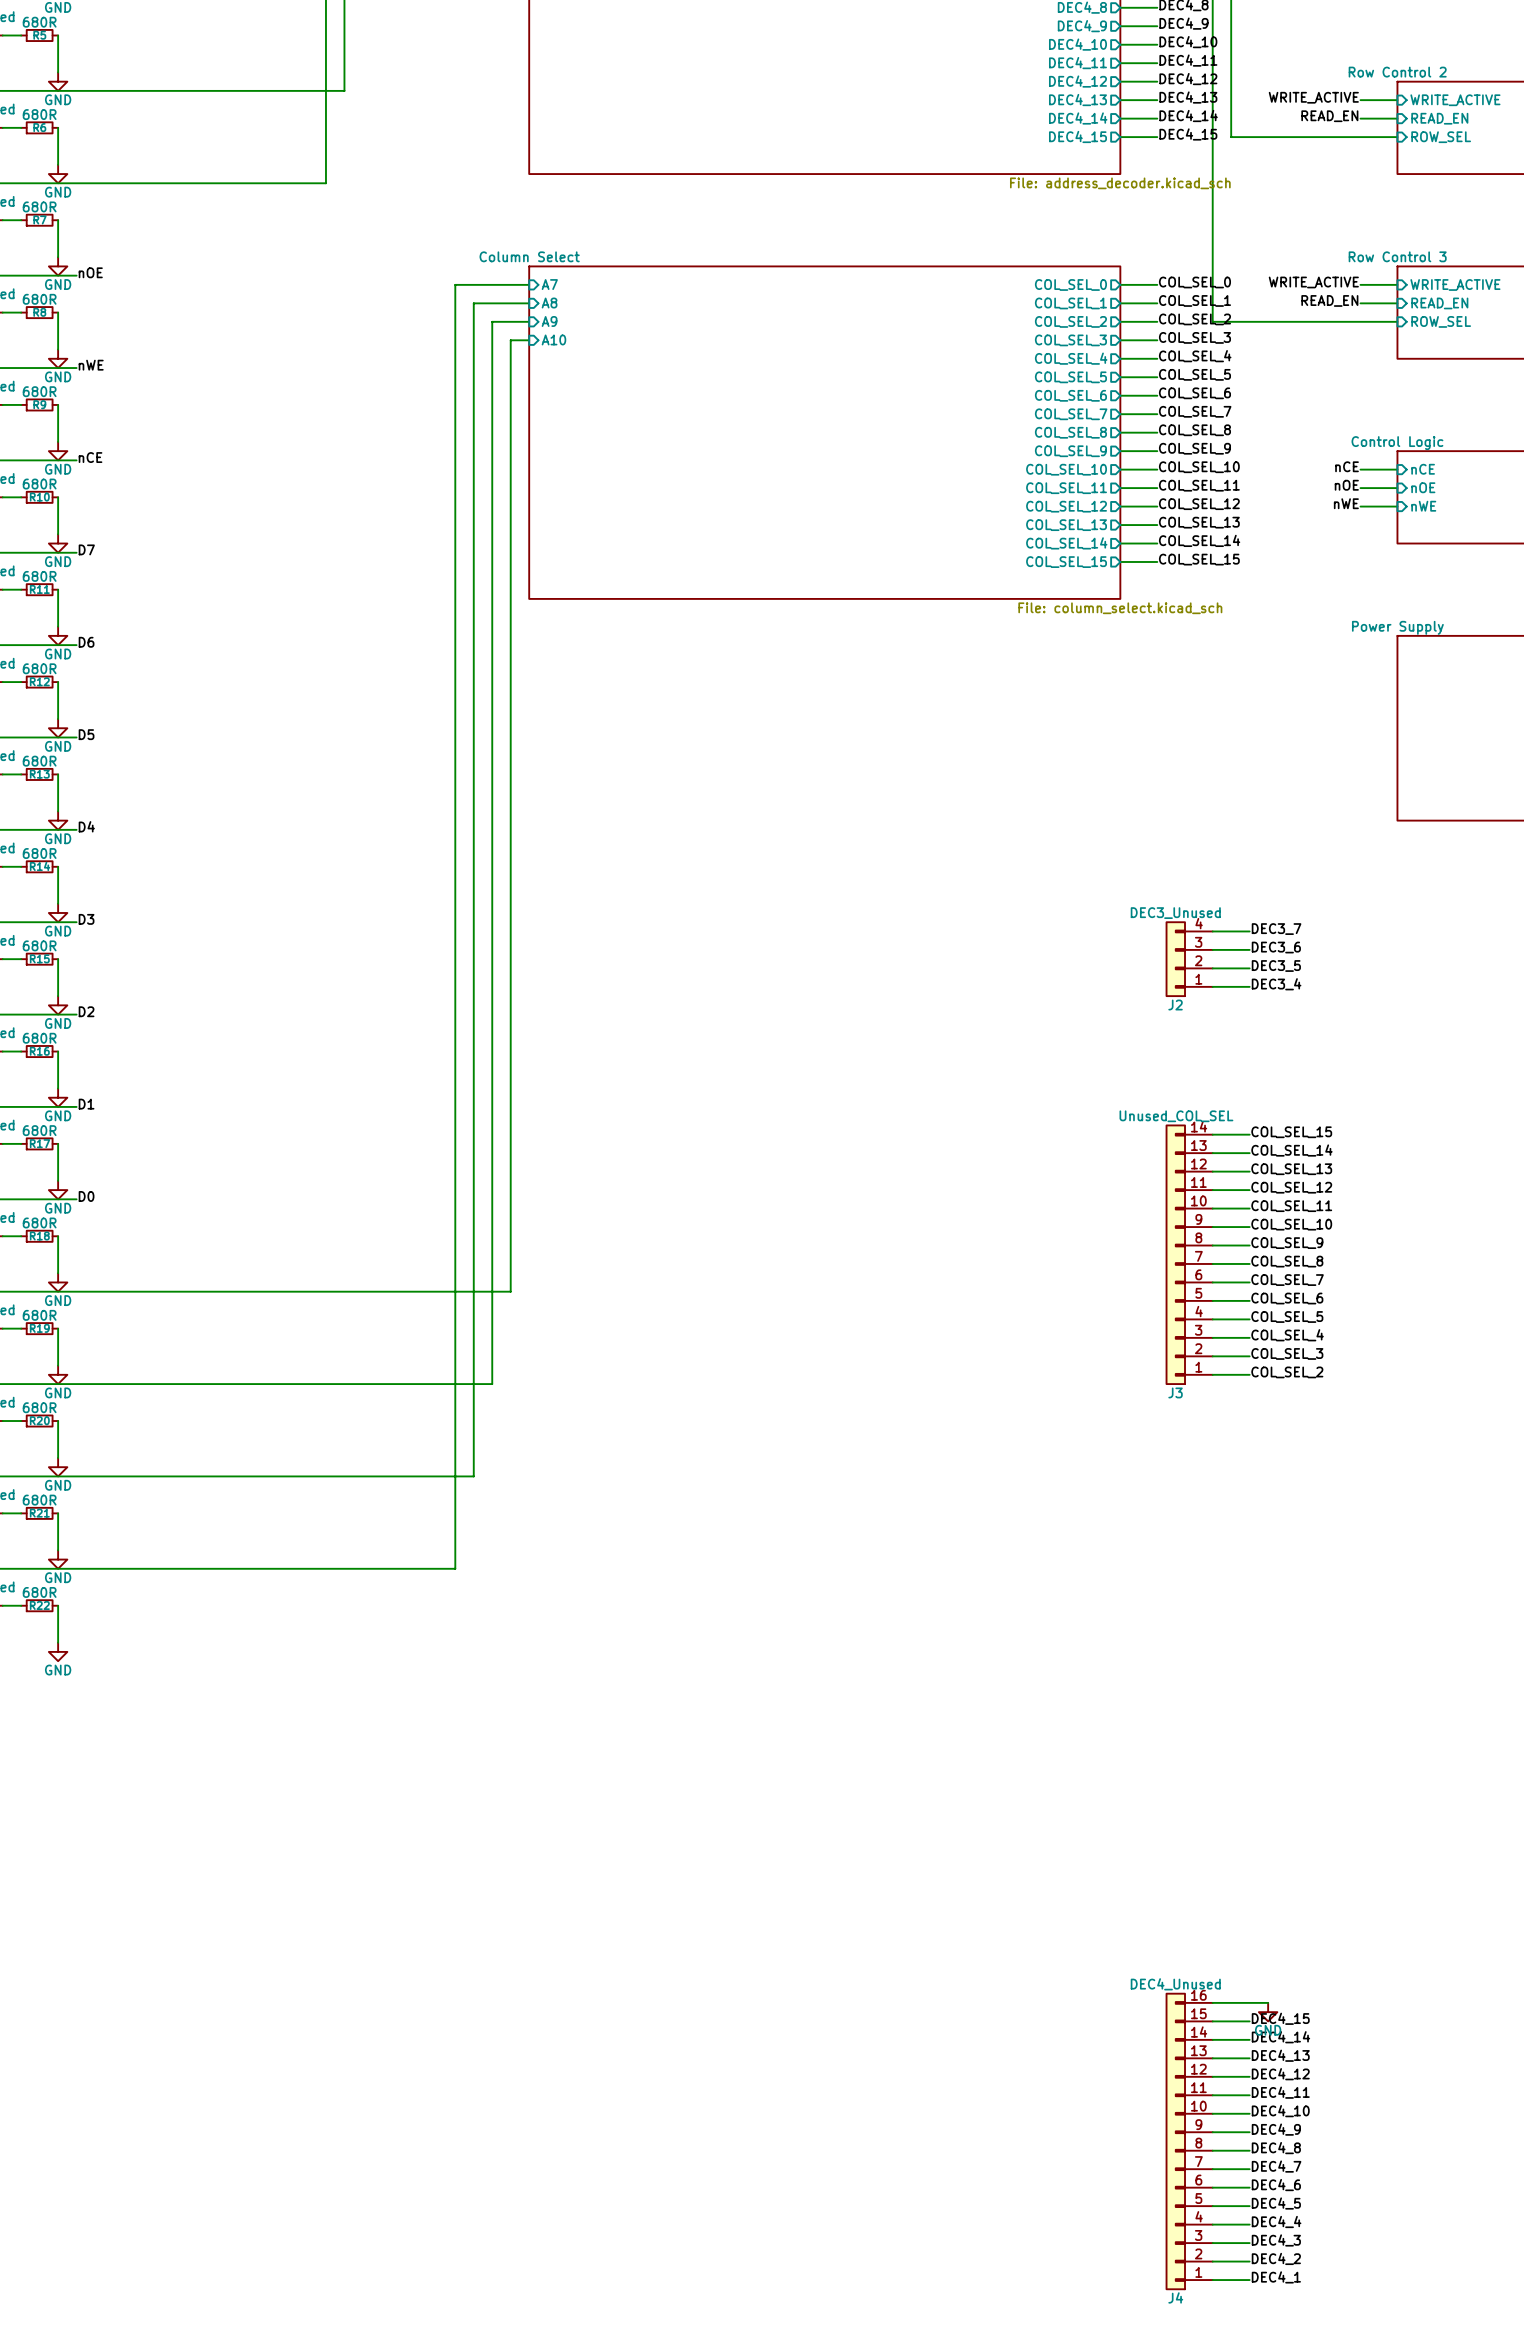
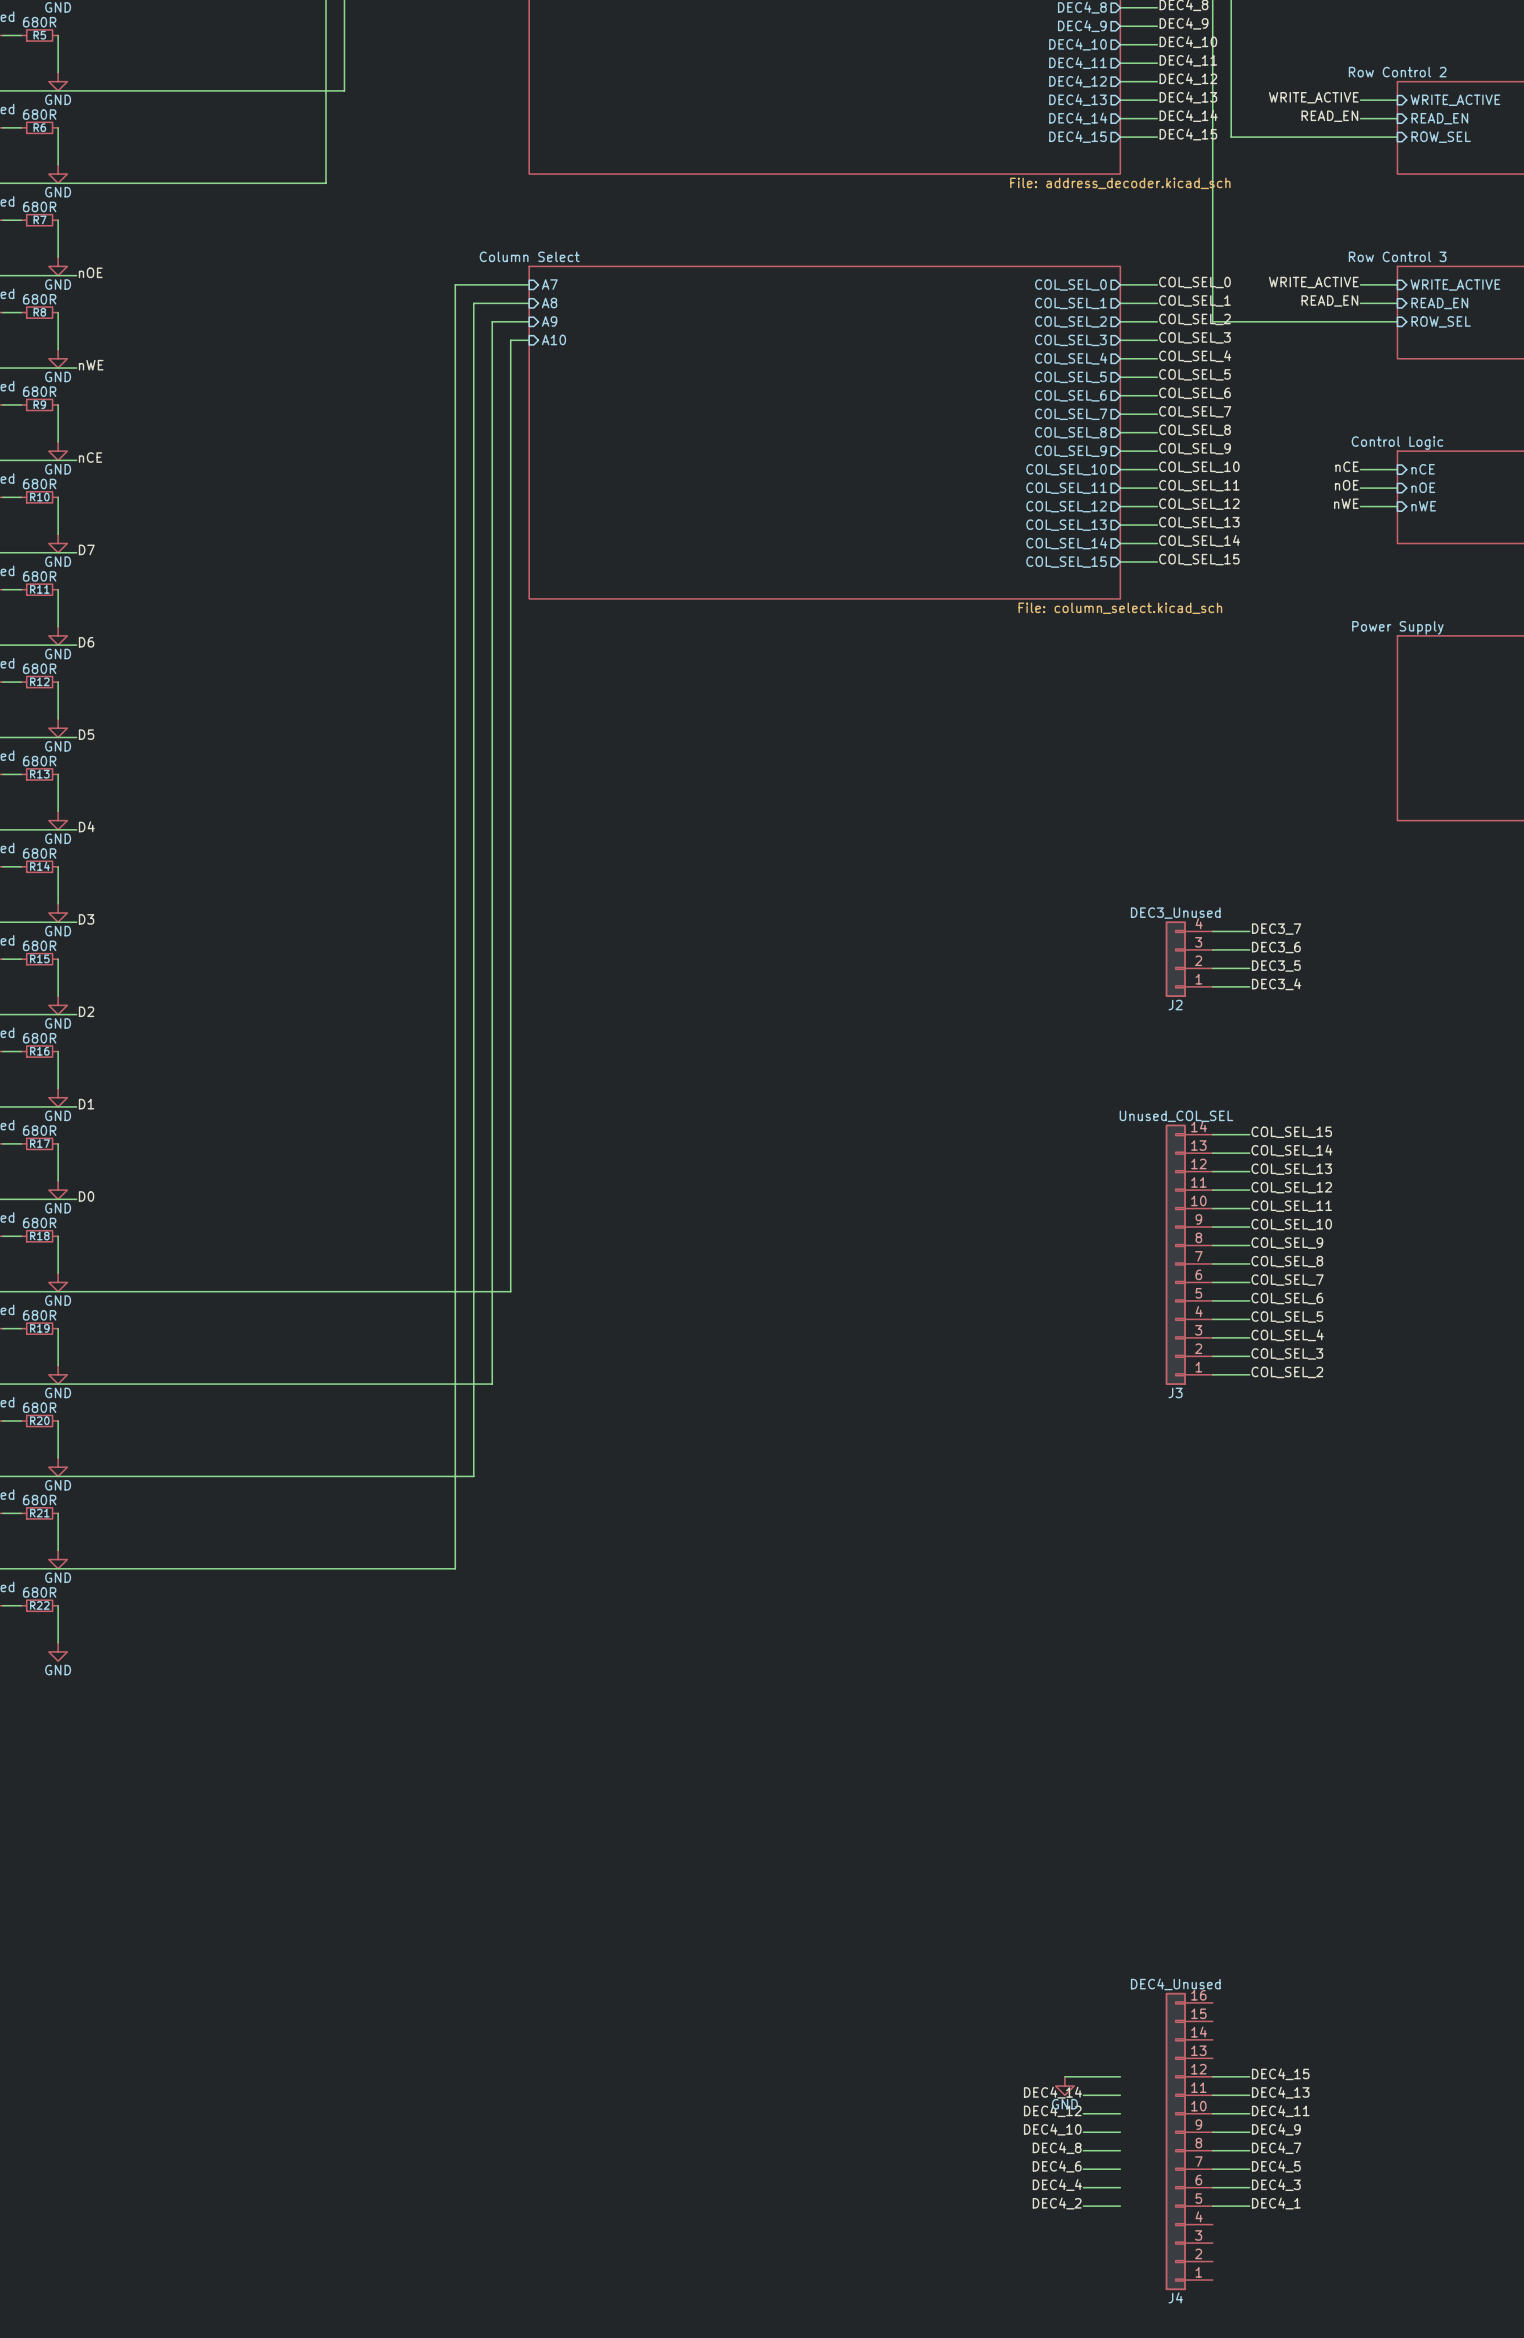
wire: (1212, 2002) (1268, 2002) -> (1064, 2076) (1120, 2076)
power symbol: GND (1268, 2012) -> none
label: DEC4_15 (1280, 2018) -> none
wire: (1212, 2021) (1249, 2021) -> (1083, 2095) (1120, 2095)
label position: DEC4_14 (1280, 2037) -> DEC4_14 (1052, 2092)
wire: (1212, 2039) (1249, 2039) -> (1083, 2113) (1120, 2113)
label: DEC4_13 (1280, 2055) -> none
wire: (1212, 2058) (1249, 2058) -> (1083, 2132) (1120, 2132)
label: DEC4_12 (1280, 2074) -> DEC4_15 (1280, 2074)
power symbol: none -> GND (1064, 2086)
label: DEC4_11 (1280, 2092) -> DEC4_13 (1280, 2092)
label: none -> DEC4_12 (1052, 2111)
label: DEC4_10 (1280, 2111) -> DEC4_11 (1280, 2111)
label: none -> DEC4_10 (1052, 2129)
label: none -> DEC4_8 (1057, 2148)
label: DEC4_8 (1276, 2148) -> DEC4_7 (1276, 2148)
label: none -> DEC4_6 (1057, 2166)
label: DEC4_7 (1276, 2166) -> DEC4_5 (1276, 2166)
label: DEC4_6 (1276, 2185) -> DEC4_3 (1276, 2185)
label: DEC4_5 (1276, 2203) -> DEC4_1 (1276, 2203)
label position: DEC4_4 (1276, 2221) -> DEC4_4 (1057, 2185)
wire: (1212, 2224) (1249, 2224) -> (1083, 2150) (1120, 2150)
label: DEC4_3 (1276, 2240) -> none
wire: (1212, 2243) (1249, 2243) -> (1083, 2169) (1120, 2169)
label position: DEC4_2 (1276, 2258) -> DEC4_2 (1057, 2203)
wire: (1212, 2261) (1249, 2261) -> (1083, 2187) (1120, 2187)
label: DEC4_1 (1276, 2277) -> none
wire: (1212, 2280) (1249, 2280) -> (1083, 2206) (1120, 2206)

